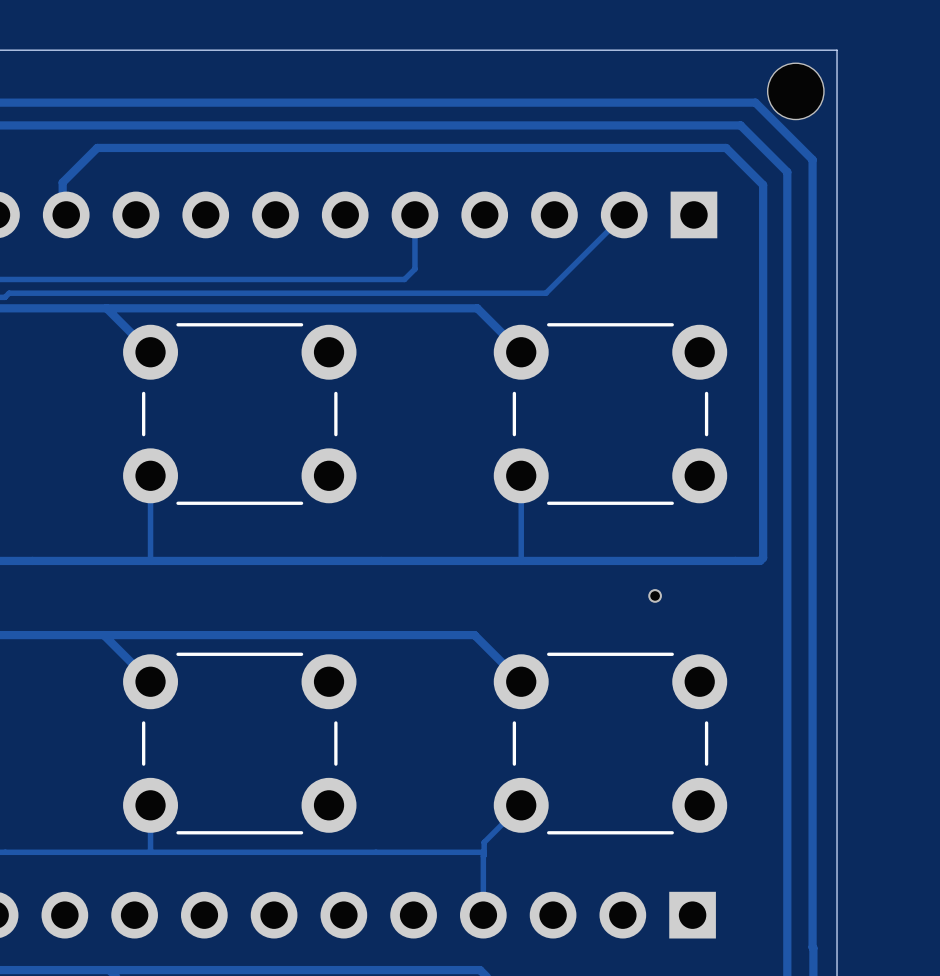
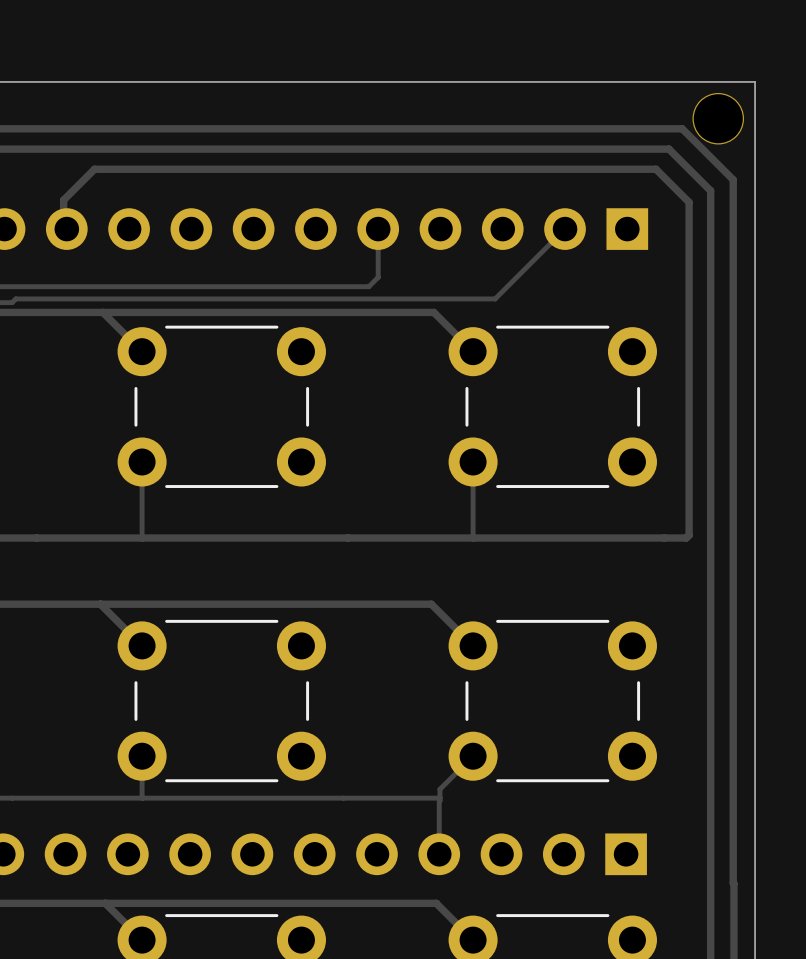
via: (655, 595) -> none

